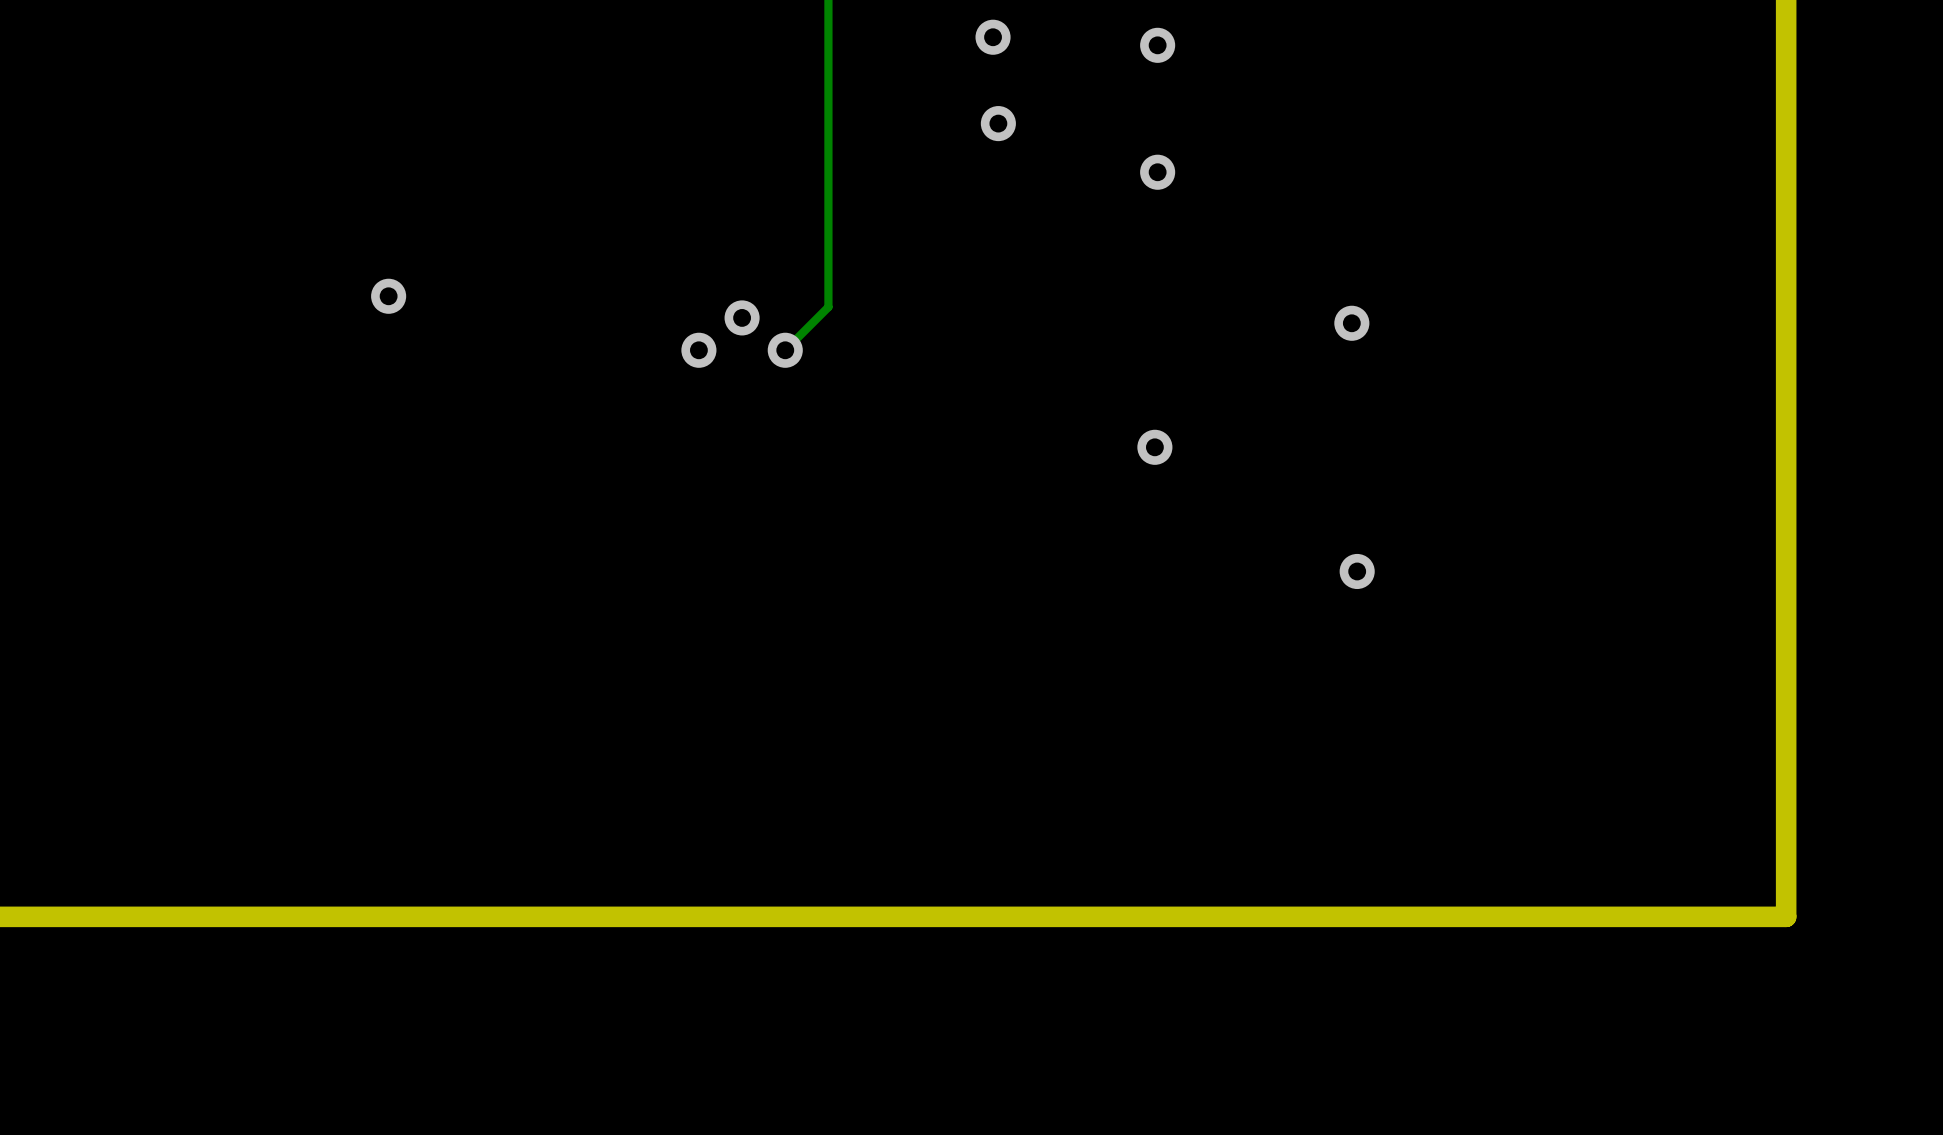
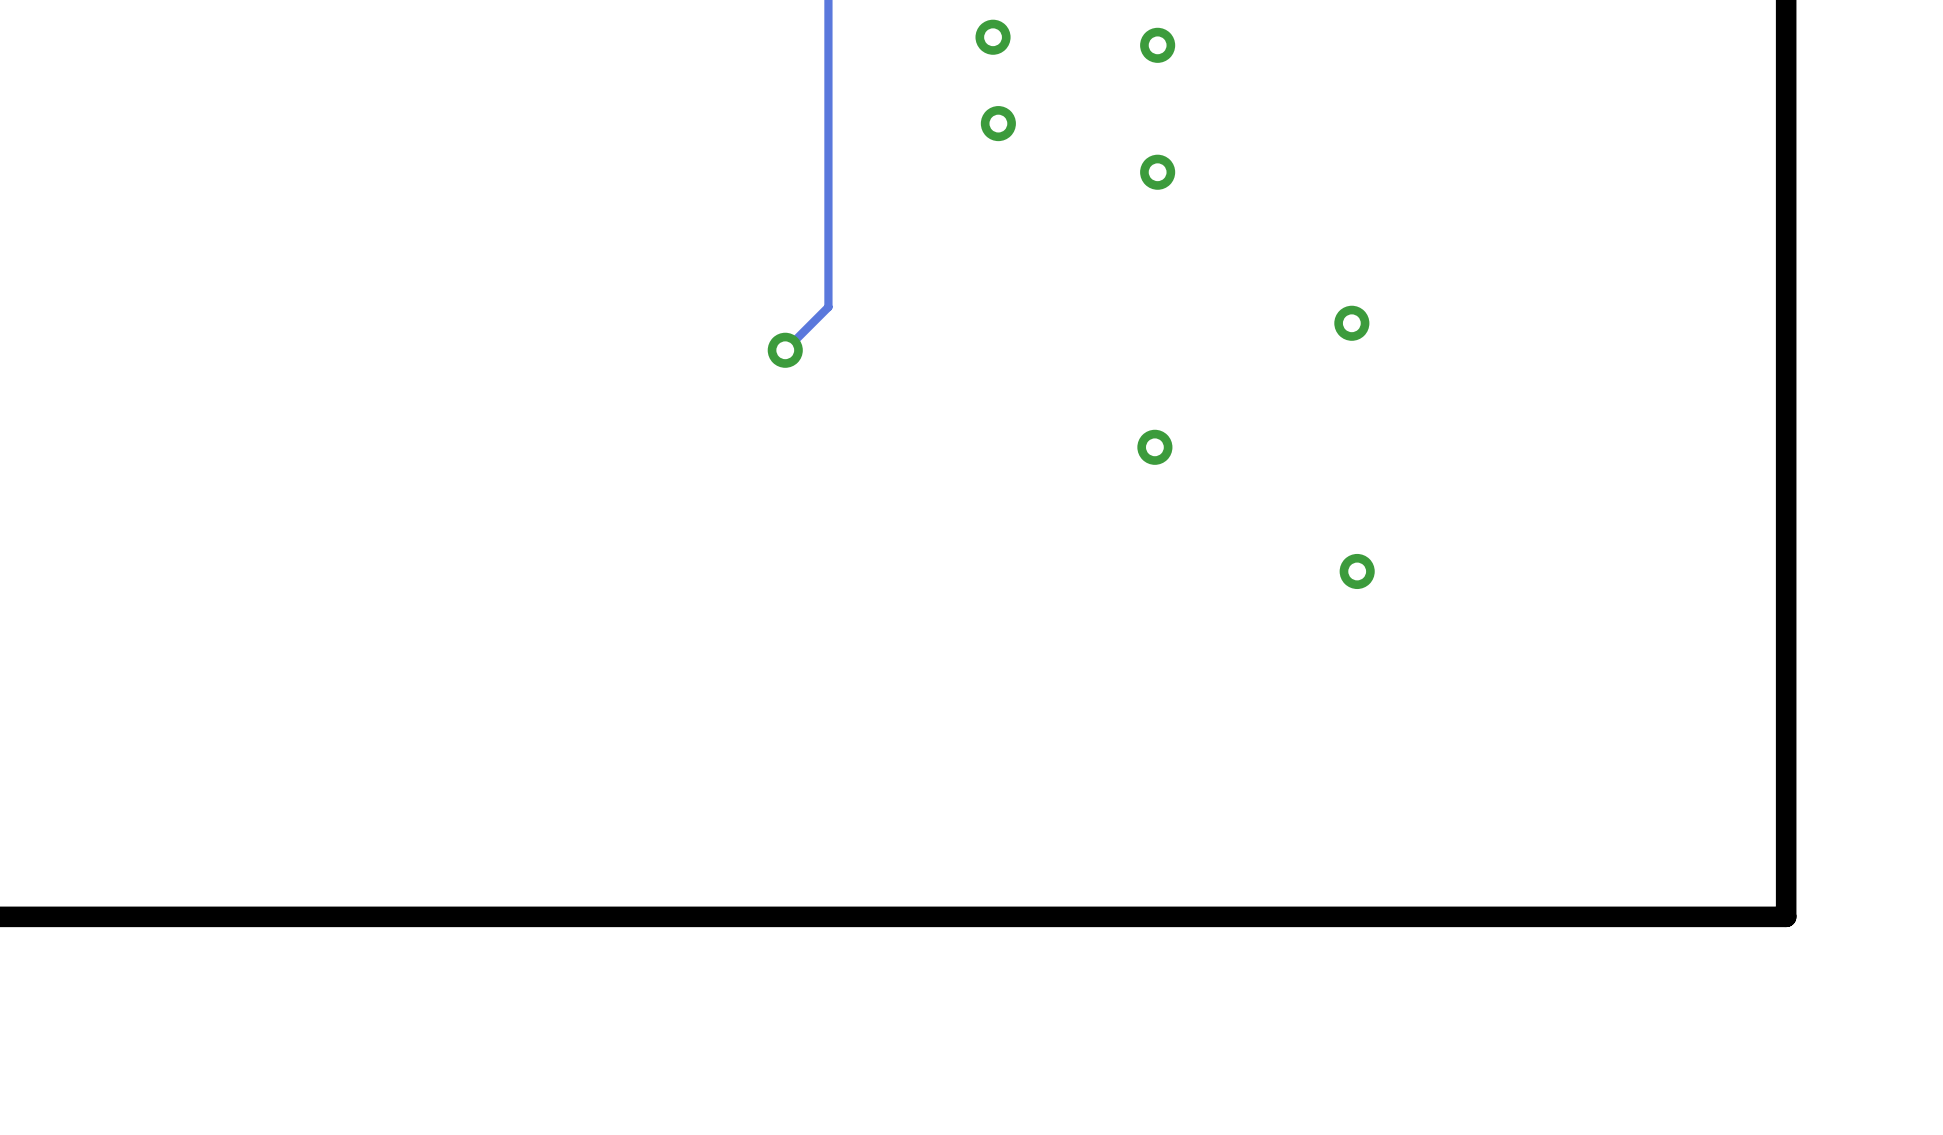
via: (388, 296) -> none
via: (742, 317) -> none
via: (698, 350) -> none

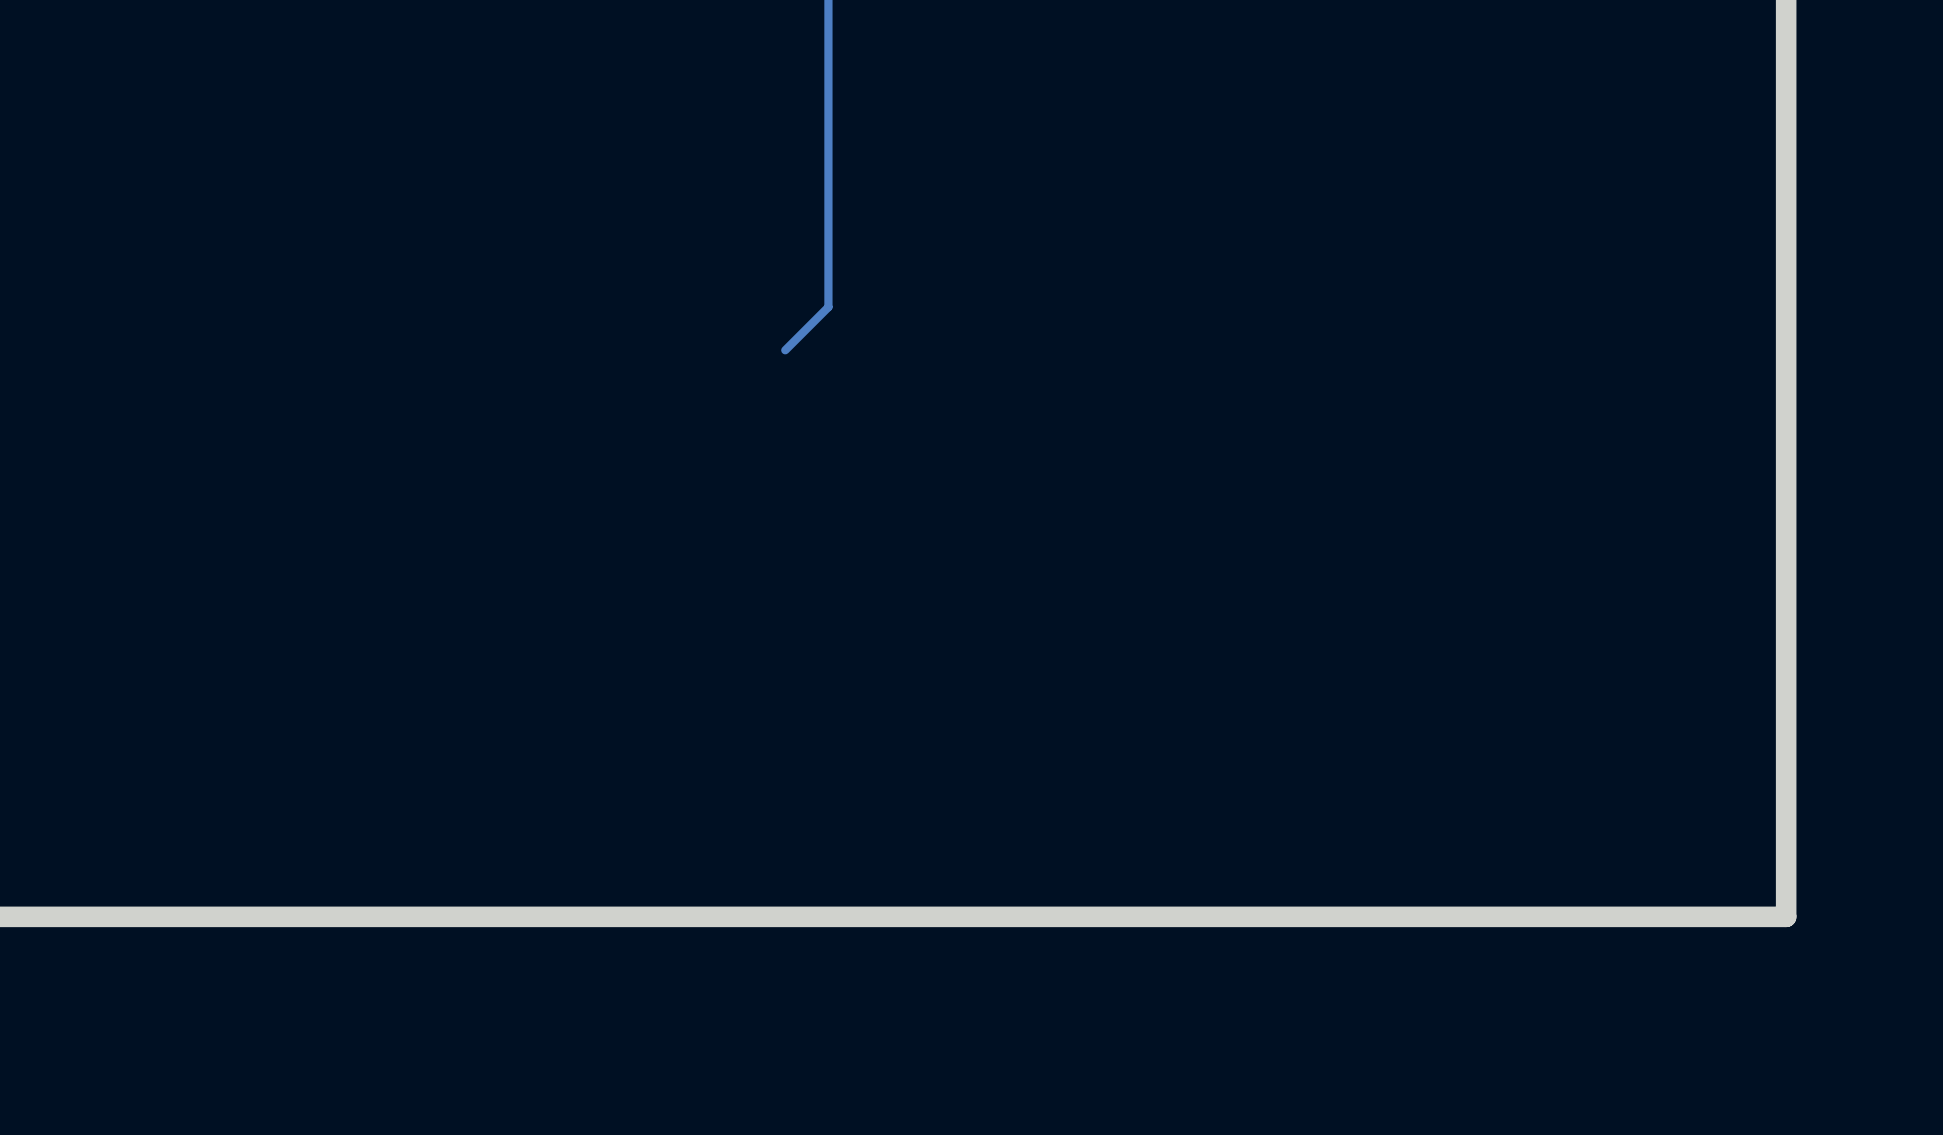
via: (993, 37) -> none
via: (1157, 45) -> none
via: (998, 123) -> none
via: (1157, 172) -> none
via: (1351, 323) -> none
via: (785, 350) -> none
via: (1154, 447) -> none
via: (1357, 571) -> none

